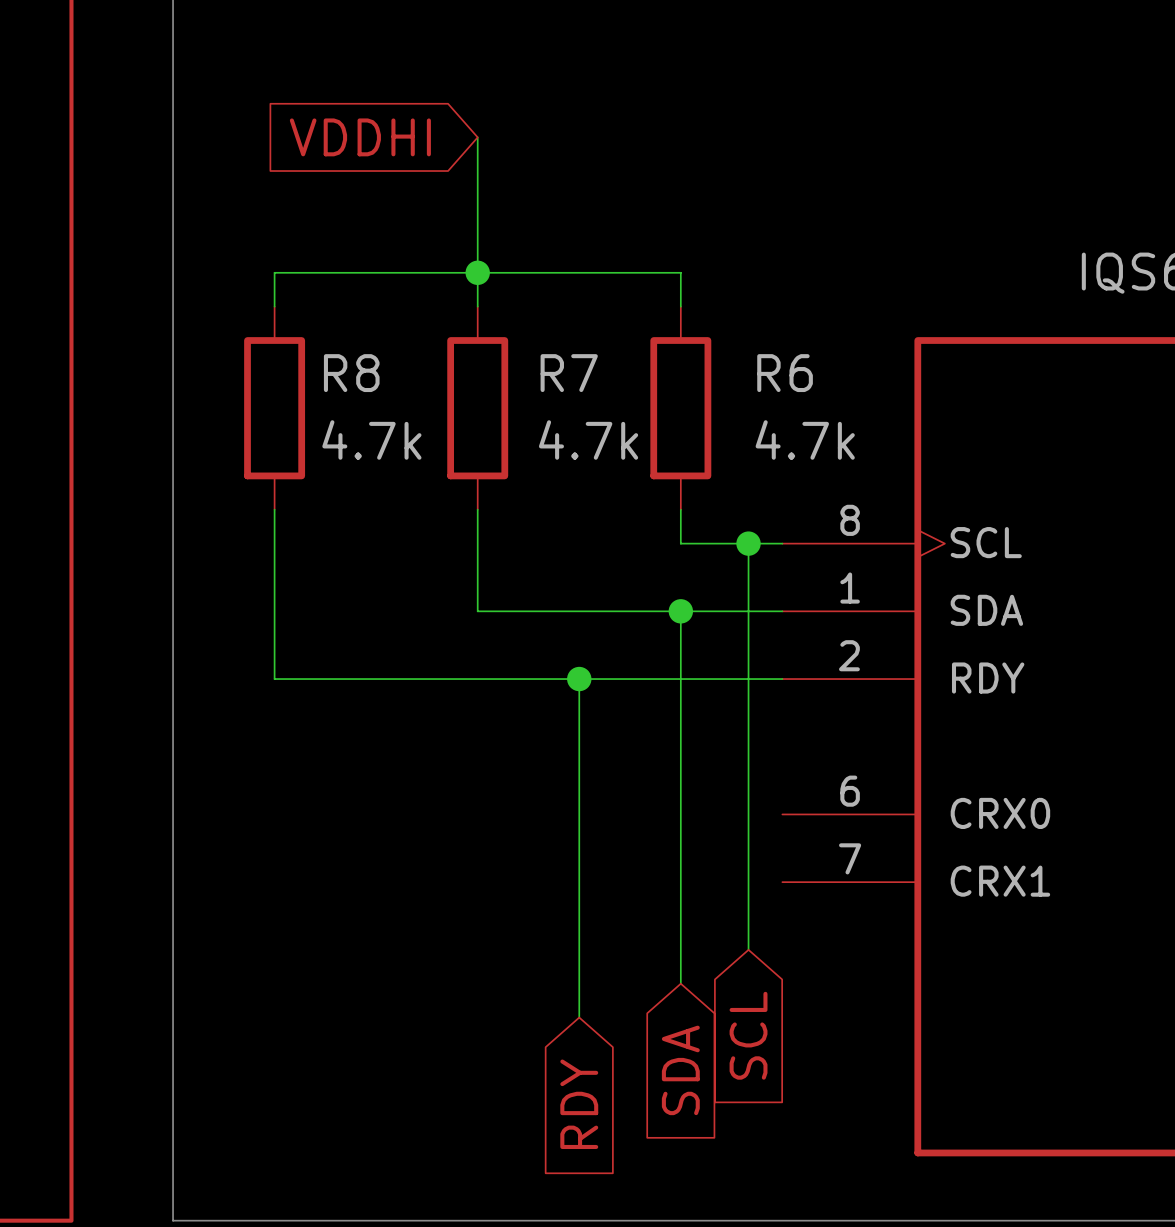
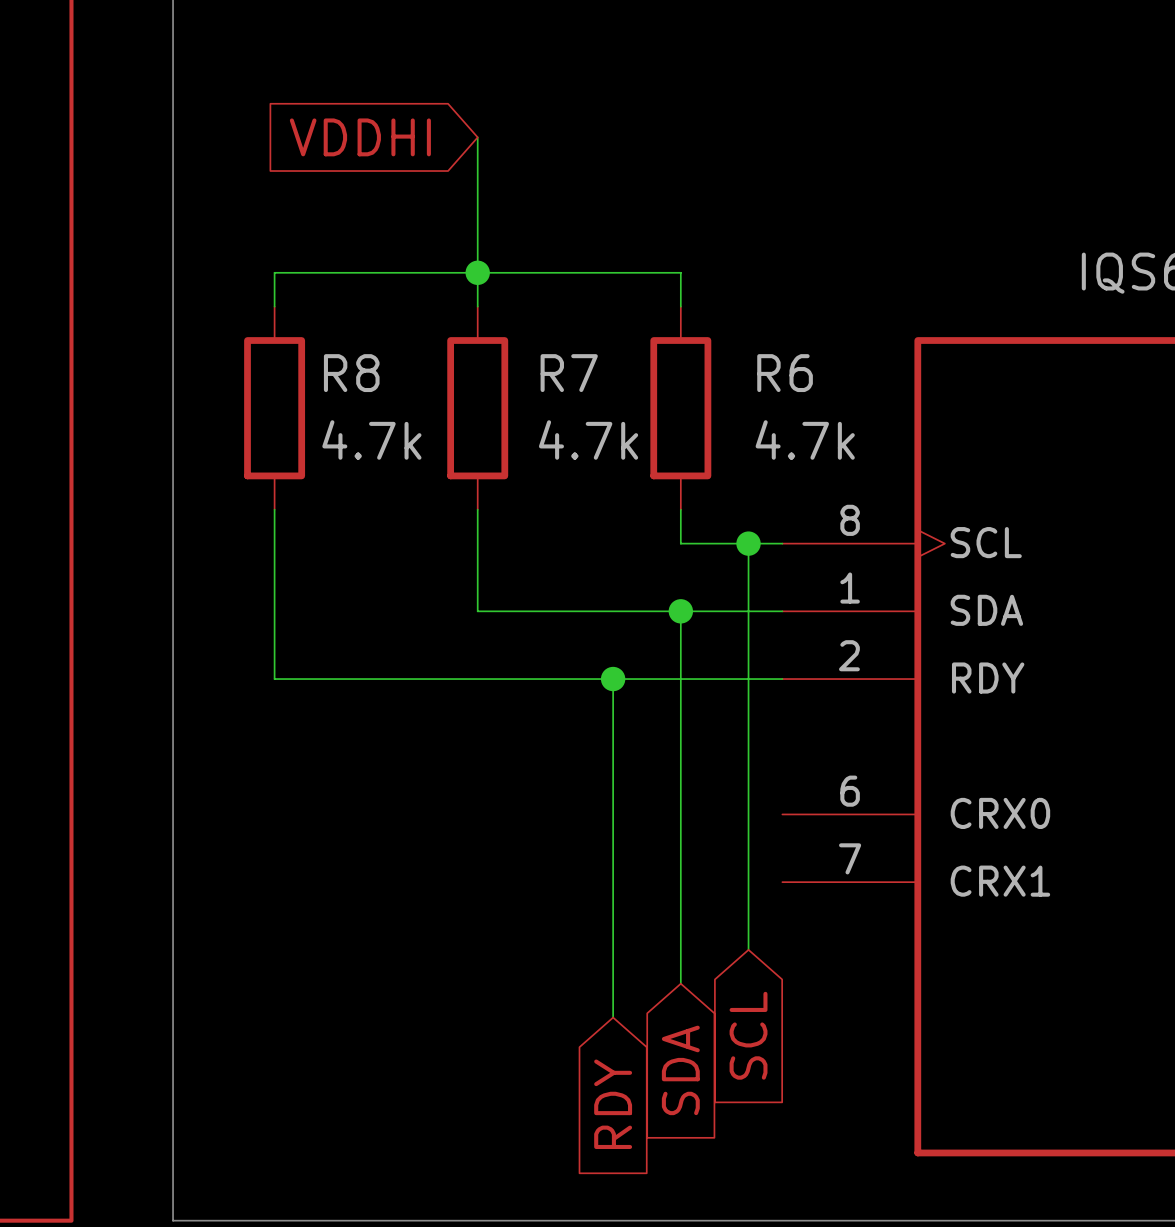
wire: (579, 679) (579, 1017) -> (613, 679) (613, 1017)
junction position: (579, 679) -> (613, 679)
global label position: RDY (579, 1104) -> RDY (613, 1104)

